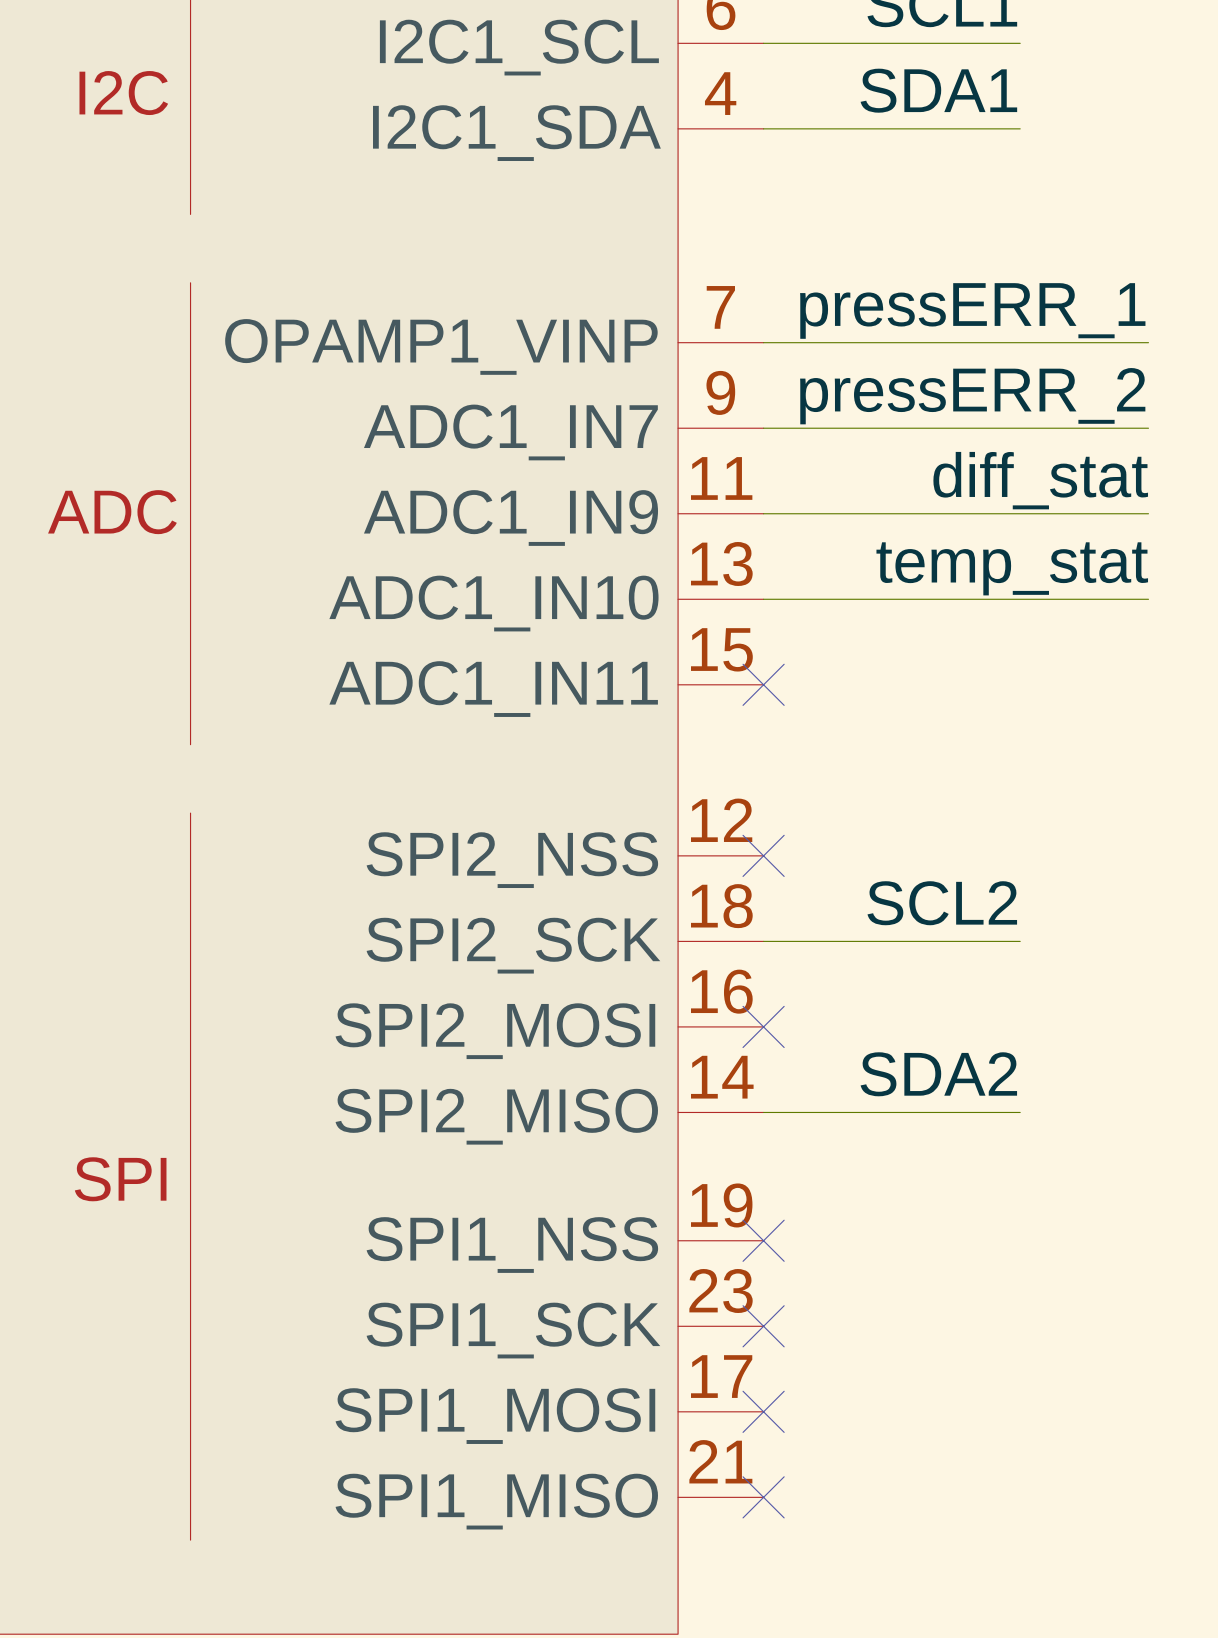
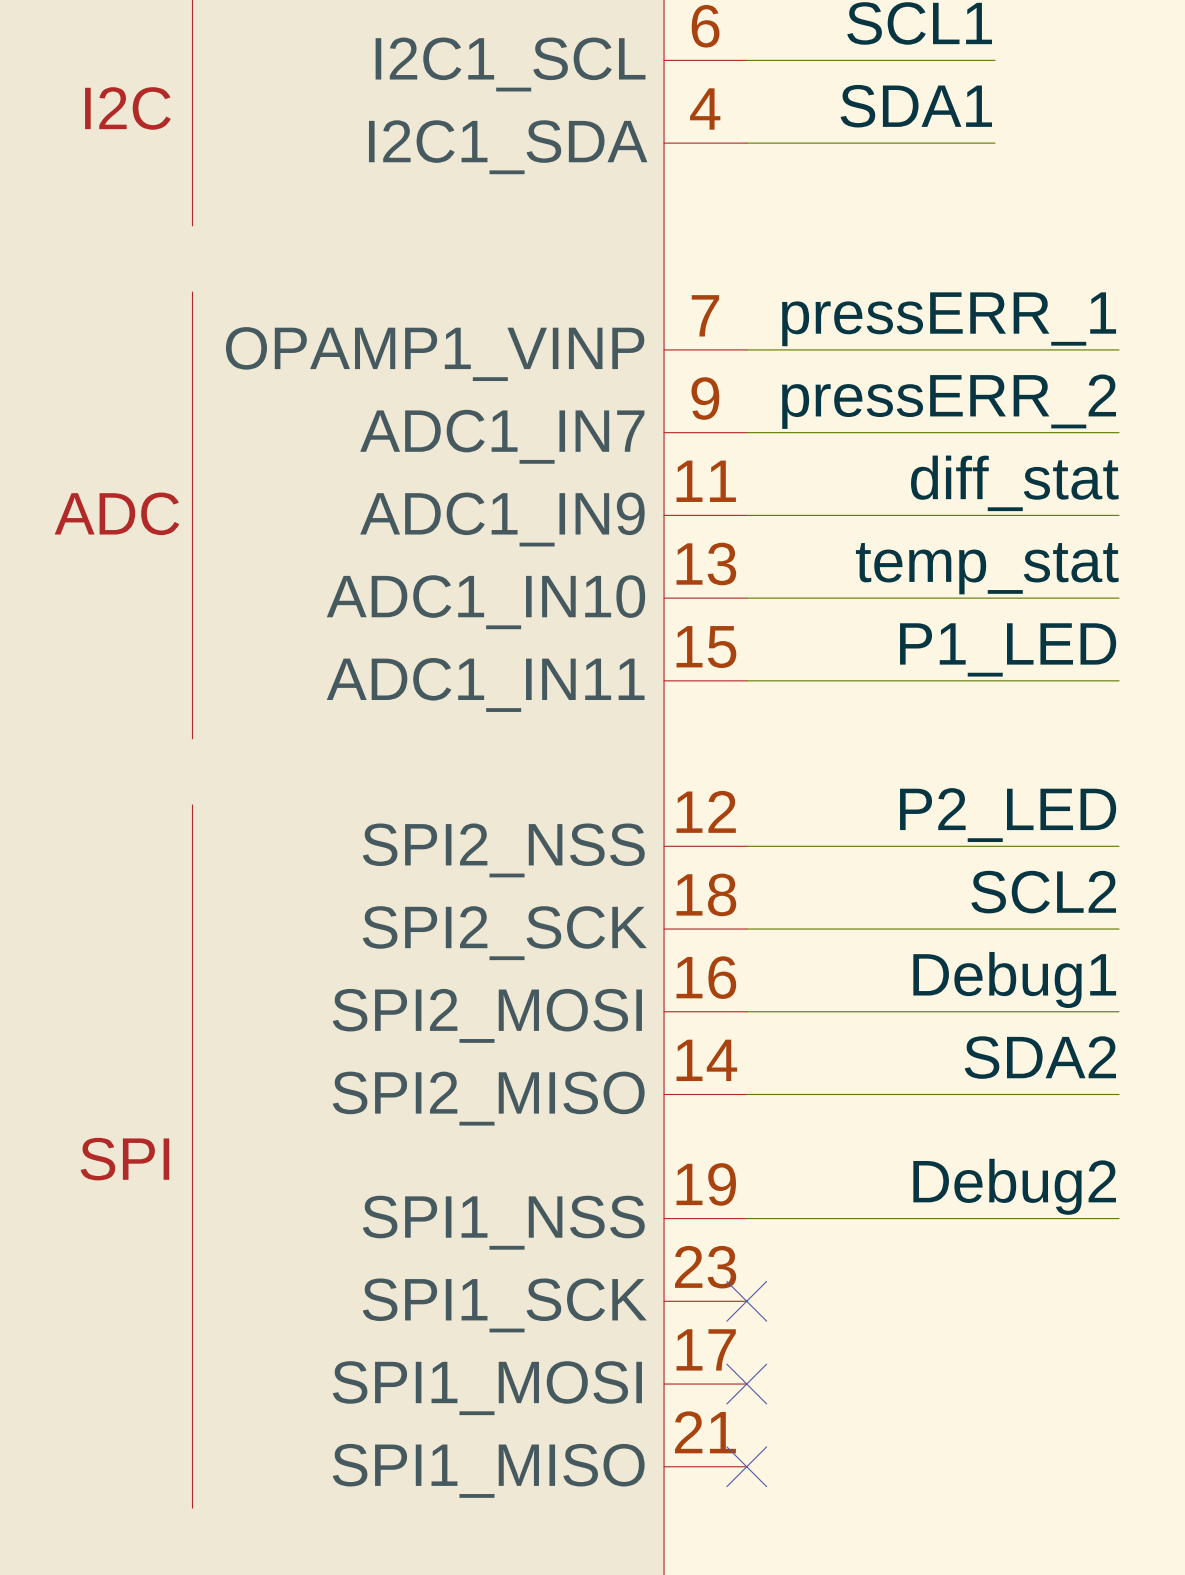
label: none -> P1_LED (1008, 649)
wire: none -> (746, 680) (1119, 680)
no-connect mark: (763, 684) -> none
label: none -> P2_LED (1008, 815)
wire: none -> (746, 846) (1119, 846)
no-connect mark: (763, 855) -> none
label position: SCL2 (942, 903) -> SCL2 (1043, 892)
wire: none -> (994, 929) (1119, 929)
label: none -> Debug1 (1014, 979)
wire: none -> (746, 1011) (1119, 1011)
no-connect mark: (763, 1026) -> none
label position: SDA2 (938, 1074) -> SDA2 (1040, 1057)
wire: none -> (994, 1094) (1119, 1094)
label: none -> Debug2 (1014, 1186)
wire: none -> (746, 1218) (1119, 1218)
no-connect mark: (763, 1240) -> none

